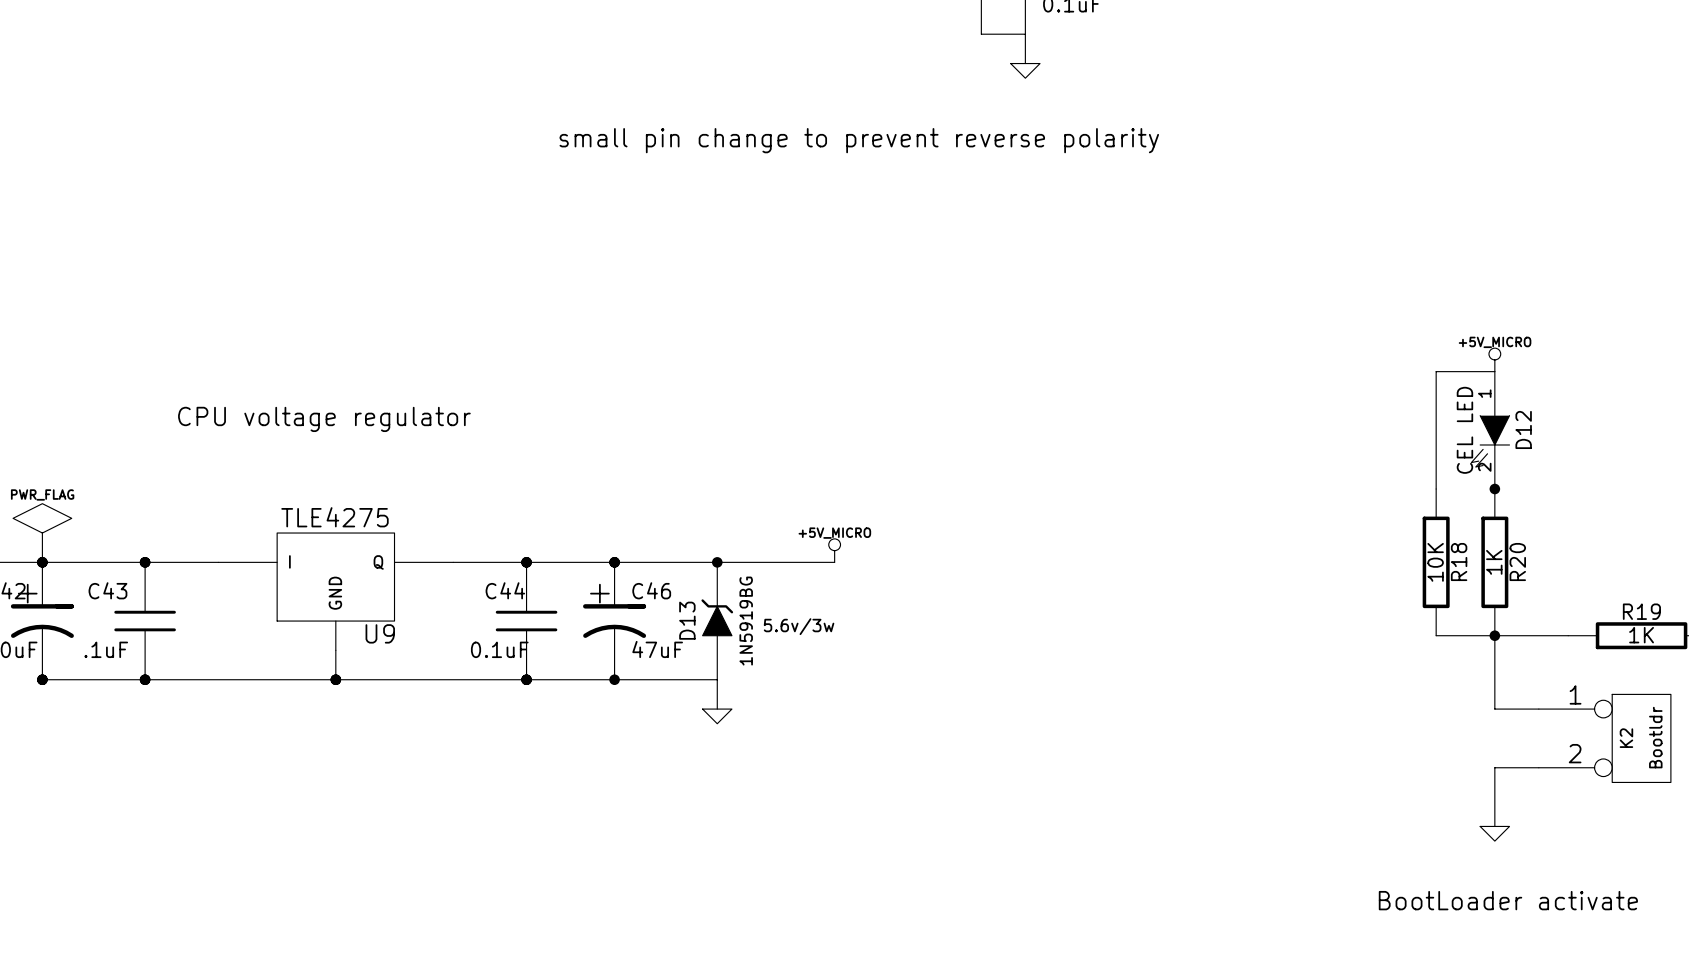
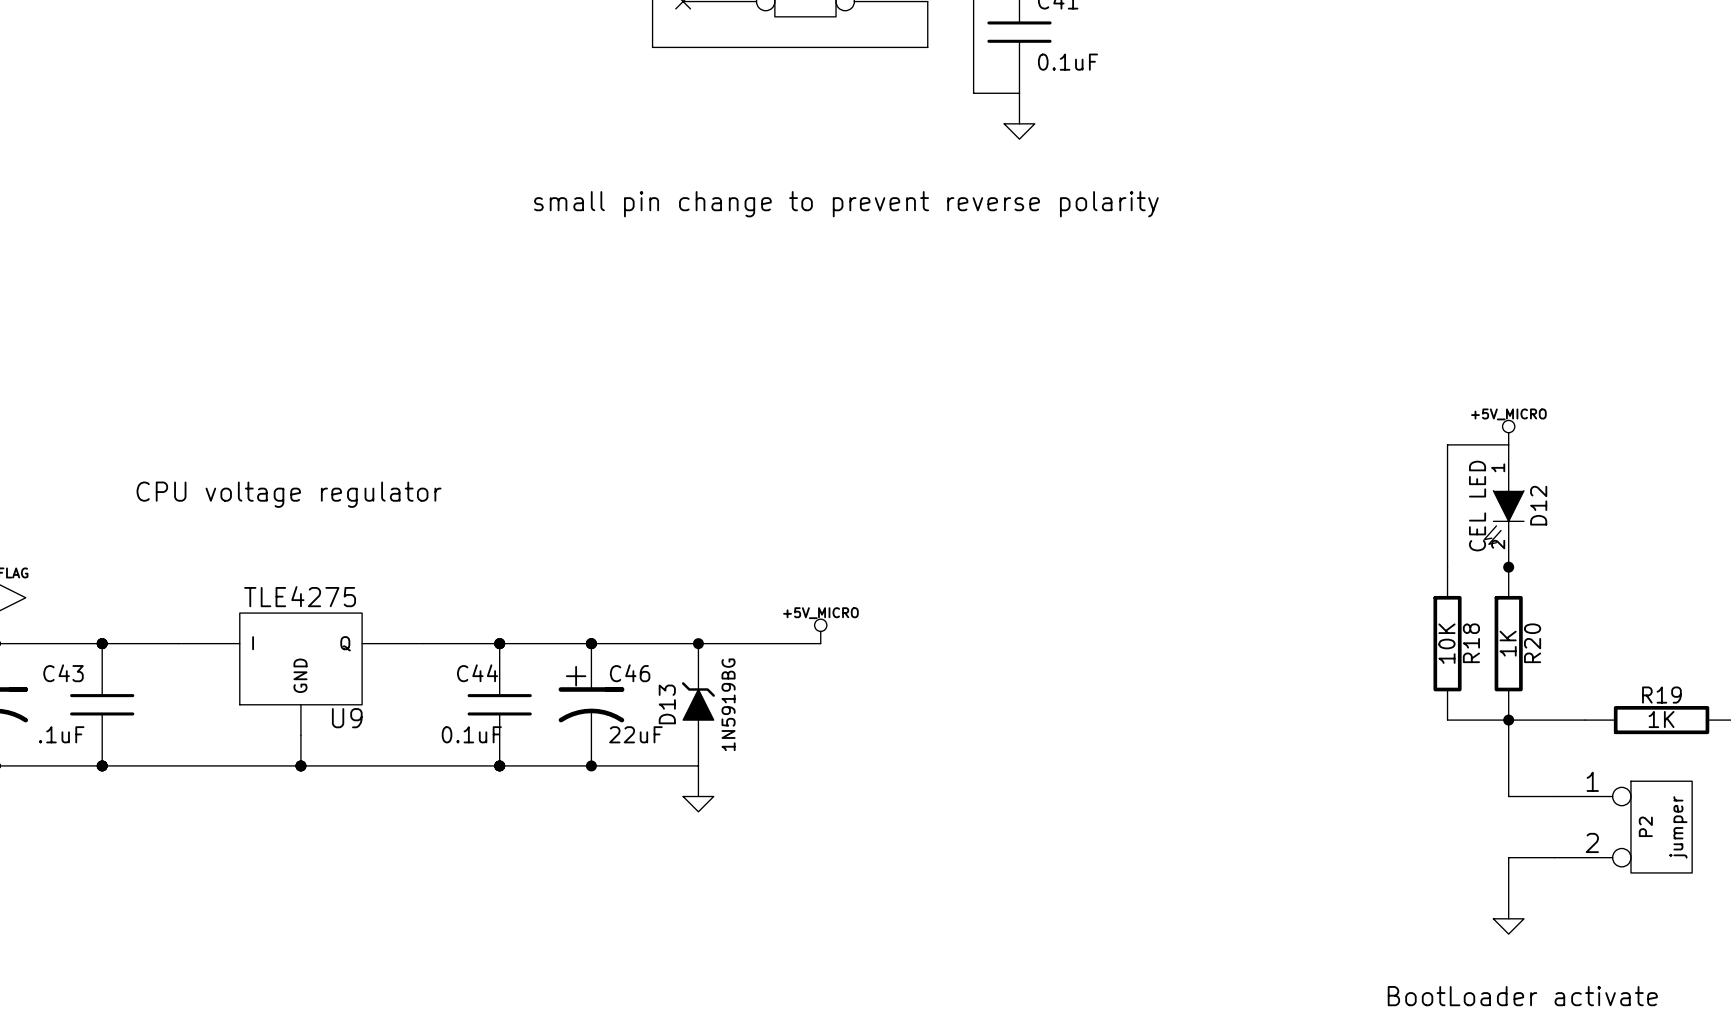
text: 5.6v/3w (799, 626) -> none
C46 value: 47uF (657, 649) -> 22uF (635, 734)
K2 value: Bootldr (1655, 737) -> jumper (1678, 827)
K2 name: K2 (1626, 738) -> P2 (1645, 826)

